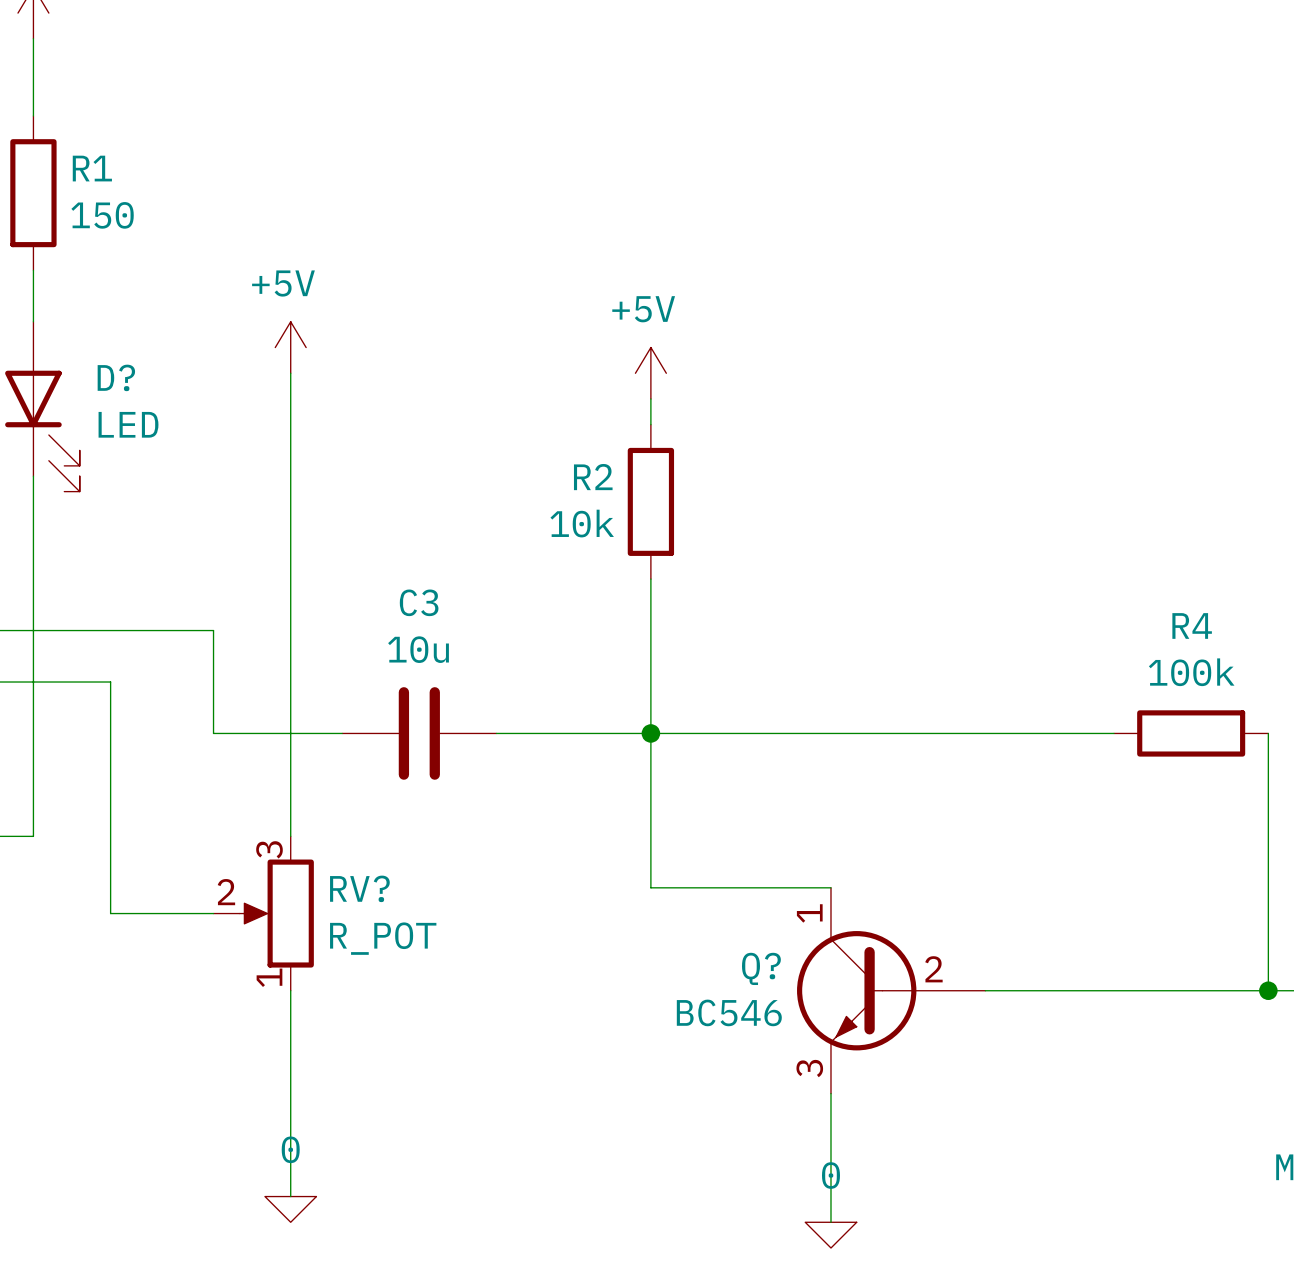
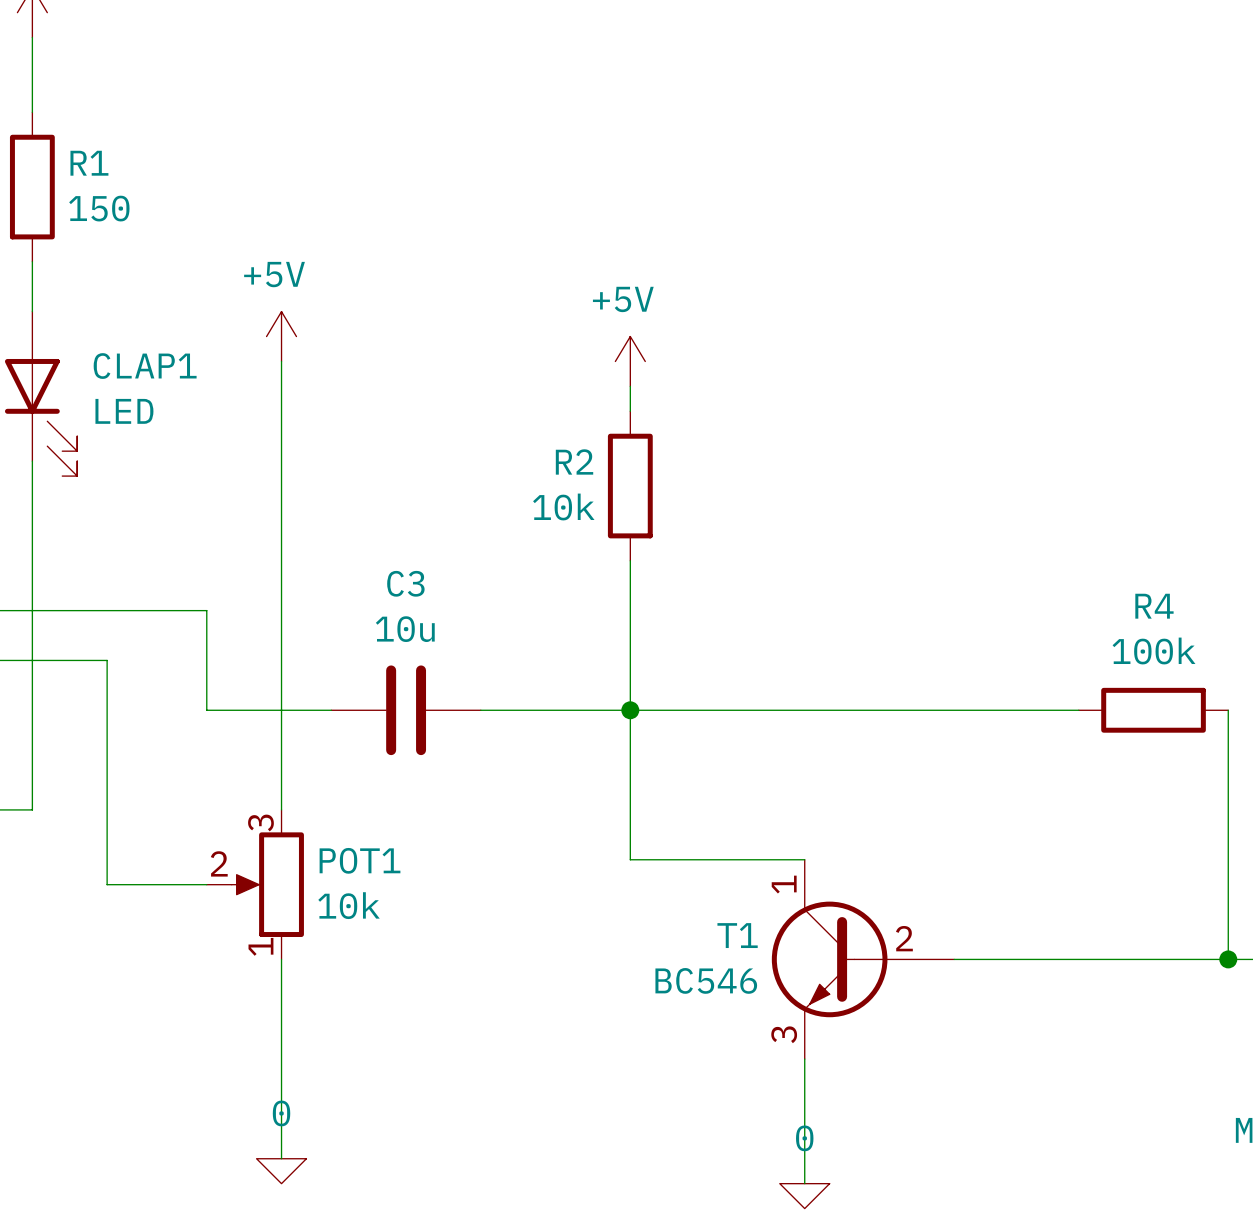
D? name: D? (116, 377) -> CLAP1 (145, 366)
RV? name: RV? (359, 888) -> POT1 (360, 860)
RV? value: R_POT (383, 938) -> 10k (349, 905)
Q? name: Q? (761, 968) -> T1 (737, 935)

